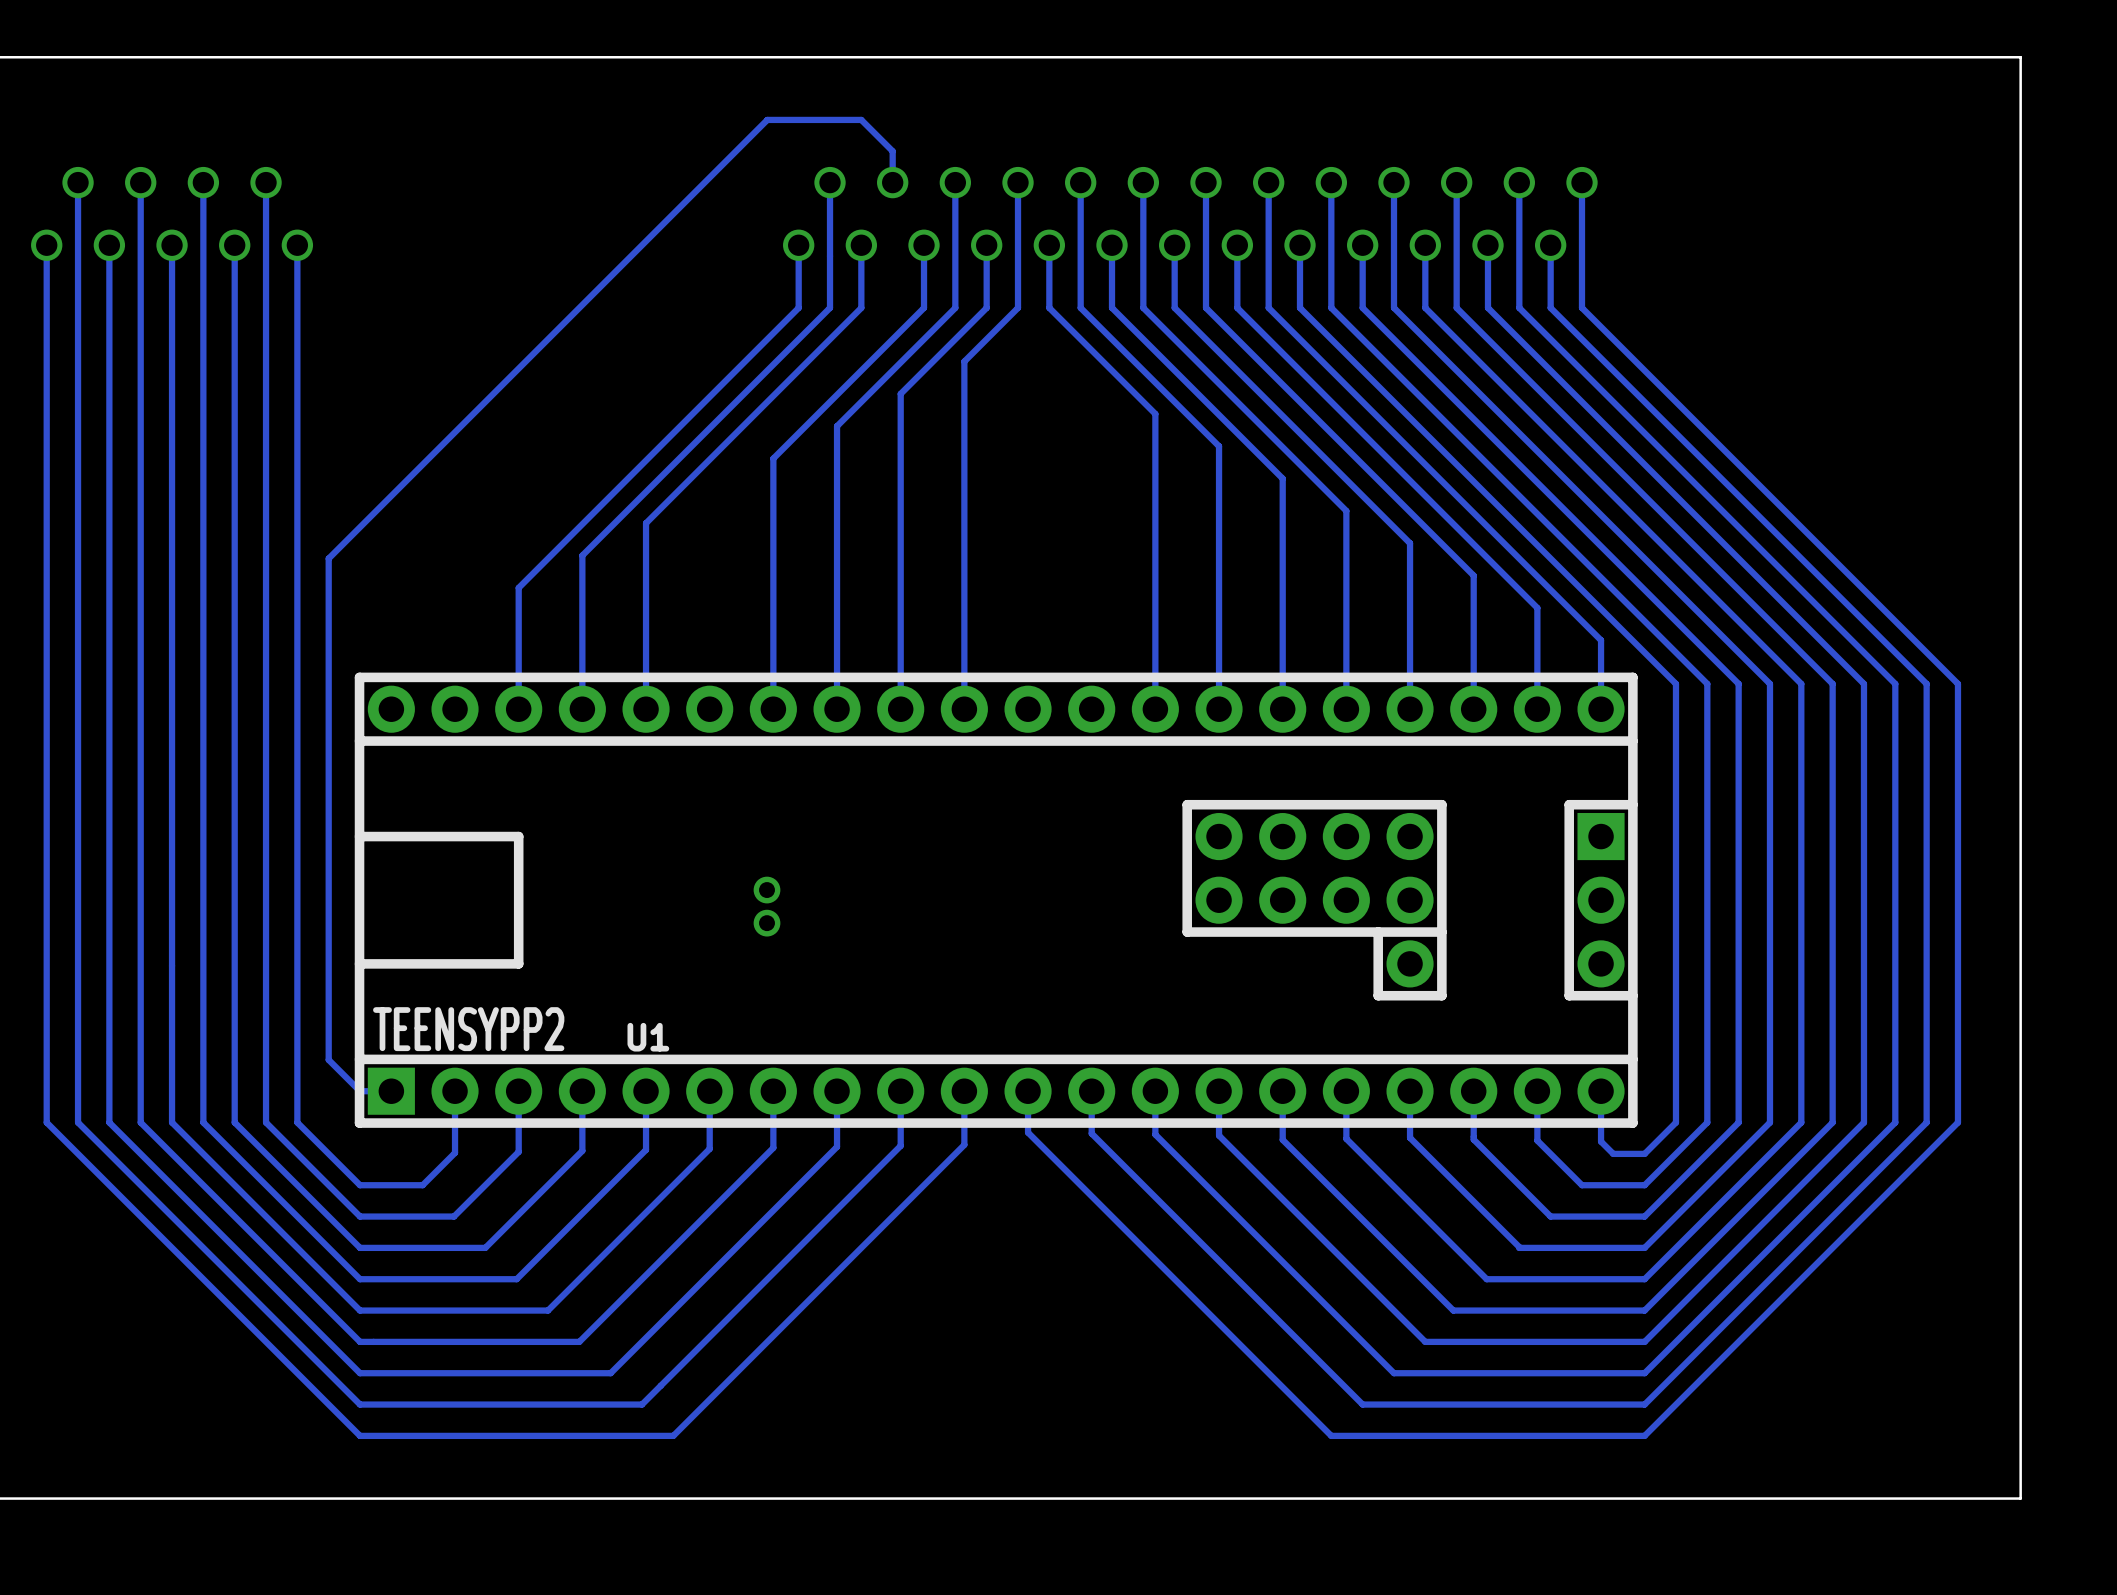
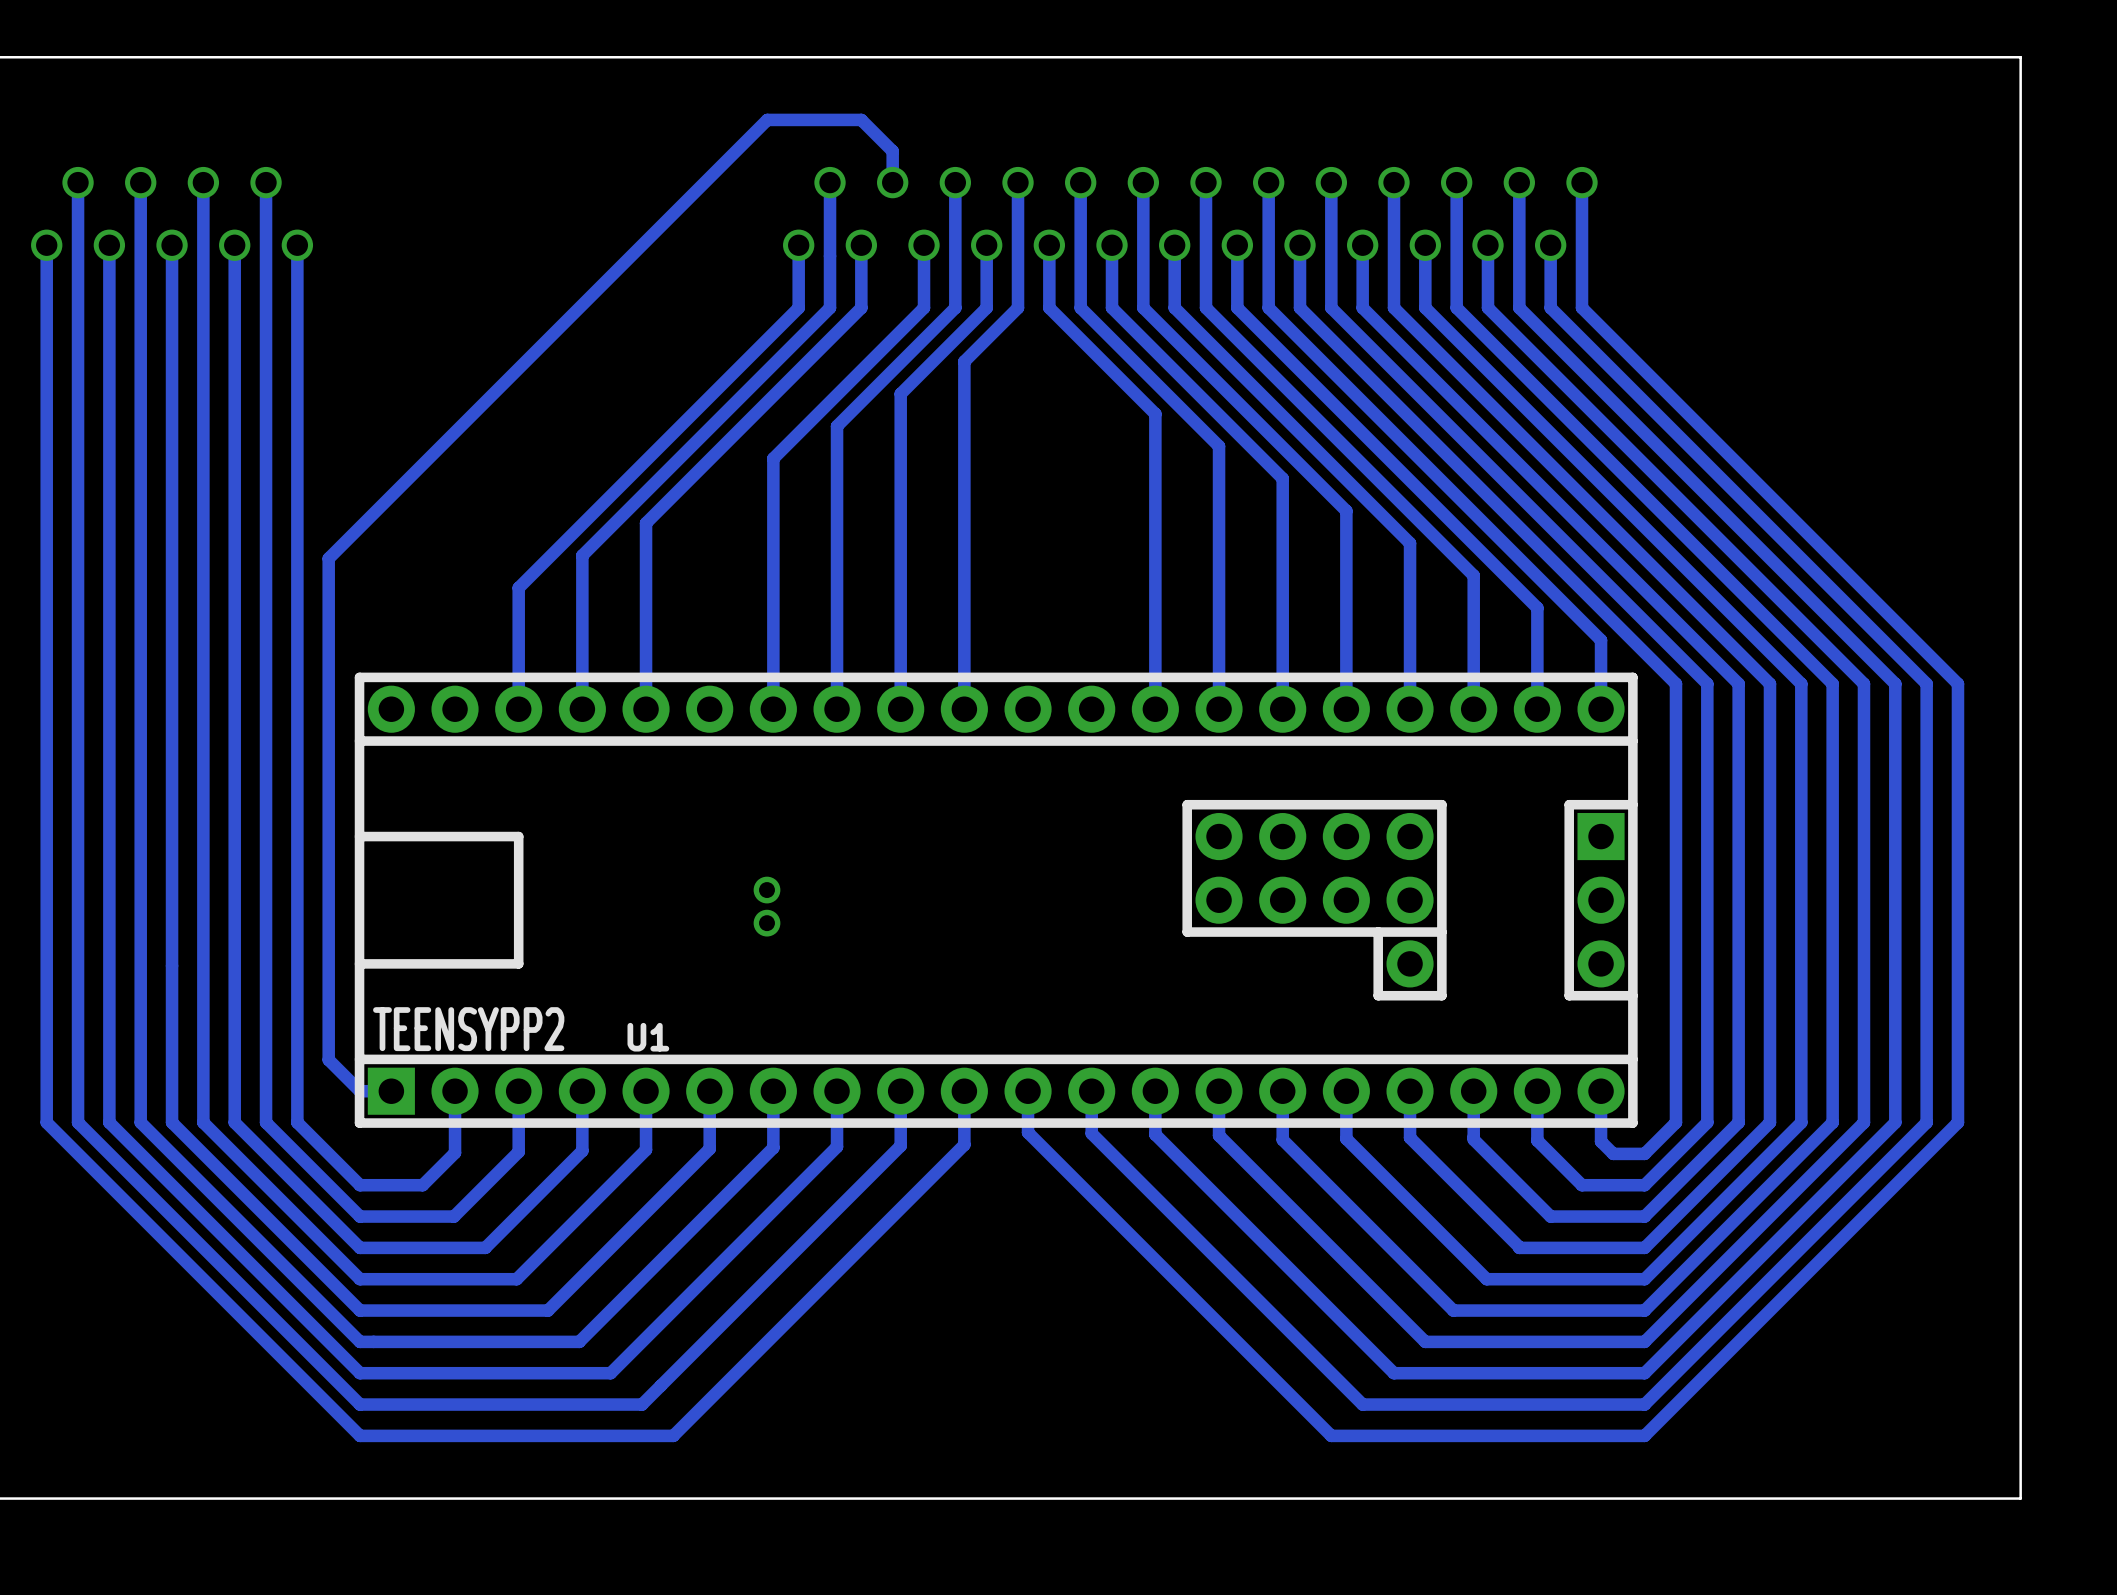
bottom track width: thin (78, 182) (78, 1122) (360, 1404) (642, 1404) (900, 1145) (900, 1091) -> thick (78, 182) (78, 1122) (360, 1404) (642, 1404) (900, 1145) (900, 1091)
bottom track width: thin (140, 182) (140, 1122) (360, 1341) (579, 1341) (773, 1147) (773, 1091) -> thick (140, 182) (140, 1122) (360, 1341) (579, 1341) (773, 1147) (773, 1091)
bottom track width: thin (203, 182) (203, 1122) (360, 1279) (516, 1279) (646, 1149) (646, 1091) -> thick (203, 182) (203, 1122) (360, 1279) (516, 1279) (646, 1149) (646, 1091)
bottom track width: thin (266, 182) (266, 1122) (360, 1216) (454, 1216) (518, 1151) (518, 1091) -> thick (266, 182) (266, 1122) (360, 1216) (454, 1216) (518, 1151) (518, 1091)
bottom track width: thin (830, 182) (830, 307) (582, 555) (582, 709) -> thick (830, 182) (830, 307) (582, 555) (582, 709)
bottom track width: thin (892, 182) (892, 151) (861, 119) (767, 119) (328, 558) (328, 1059) (360, 1091) (391, 1091) -> thick (892, 182) (892, 151) (861, 119) (767, 119) (328, 558) (328, 1059) (360, 1091) (391, 1091)
bottom track width: thin (955, 182) (955, 307) (837, 426) (837, 709) -> thick (955, 182) (955, 307) (837, 426) (837, 709)
bottom track width: thin (1018, 182) (1018, 307) (964, 361) (964, 709) -> thick (1018, 182) (1018, 307) (964, 361) (964, 709)
bottom track width: thin (1080, 182) (1080, 307) (1219, 446) (1219, 709) -> thick (1080, 182) (1080, 307) (1219, 446) (1219, 709)
bottom track width: thin (1143, 182) (1143, 307) (1346, 510) (1346, 709) -> thick (1143, 182) (1143, 307) (1346, 510) (1346, 709)
bottom track width: thin (1206, 182) (1206, 307) (1473, 575) (1473, 709) -> thick (1206, 182) (1206, 307) (1473, 575) (1473, 709)
bottom track width: thin (1268, 182) (1268, 307) (1601, 640) (1601, 709) -> thick (1268, 182) (1268, 307) (1601, 640) (1601, 709)
bottom track width: thin (1331, 182) (1331, 307) (1707, 683) (1707, 1122) (1644, 1185) (1581, 1185) (1537, 1140) (1537, 1091) -> thick (1331, 182) (1331, 307) (1707, 683) (1707, 1122) (1644, 1185) (1581, 1185) (1537, 1140) (1537, 1091)
bottom track width: thin (1394, 182) (1394, 307) (1769, 683) (1769, 1122) (1644, 1247) (1519, 1247) (1410, 1137) (1410, 1091) -> thick (1394, 182) (1394, 307) (1769, 683) (1769, 1122) (1644, 1247) (1519, 1247) (1410, 1137) (1410, 1091)
bottom track width: thin (1456, 182) (1456, 307) (1832, 683) (1832, 1122) (1644, 1310) (1453, 1310) (1282, 1139) (1282, 1091) -> thick (1456, 182) (1456, 307) (1832, 683) (1832, 1122) (1644, 1310) (1453, 1310) (1282, 1139) (1282, 1091)
bottom track width: thin (1519, 182) (1519, 307) (1895, 683) (1895, 1122) (1644, 1373) (1394, 1373) (1155, 1134) (1155, 1091) -> thick (1519, 182) (1519, 307) (1895, 683) (1895, 1122) (1644, 1373) (1394, 1373) (1155, 1134) (1155, 1091)
bottom track width: thin (1581, 182) (1581, 307) (1957, 683) (1957, 1122) (1644, 1435) (1331, 1435) (1028, 1132) (1028, 1091) -> thick (1581, 182) (1581, 307) (1957, 683) (1957, 1122) (1644, 1435) (1331, 1435) (1028, 1132) (1028, 1091)
bottom track width: thin (46, 245) (46, 1122) (360, 1435) (673, 1435) (964, 1144) (964, 1091) -> thick (46, 245) (46, 1122) (360, 1435) (673, 1435) (964, 1144) (964, 1091)
bottom track width: thin (109, 245) (109, 1122) (360, 1373) (610, 1373) (837, 1146) (837, 1091) -> thick (109, 245) (109, 1122) (360, 1373) (610, 1373) (837, 1146) (837, 1091)
bottom track width: thin (172, 245) (172, 1122) (360, 1310) (548, 1310) (709, 1148) (709, 1091) -> thick (172, 245) (172, 1122) (360, 1310) (548, 1310) (709, 1148) (709, 1091)
bottom track width: thin (234, 245) (234, 1122) (360, 1247) (485, 1247) (582, 1150) (582, 1091) -> thick (234, 245) (234, 1122) (360, 1247) (485, 1247) (582, 1150) (582, 1091)
bottom track width: thin (297, 245) (297, 1122) (360, 1185) (422, 1185) (455, 1152) (455, 1091) -> thick (297, 245) (297, 1122) (360, 1185) (422, 1185) (455, 1152) (455, 1091)
bottom track width: thin (798, 245) (798, 307) (518, 587) (518, 709) -> thick (798, 245) (798, 307) (518, 587) (518, 709)
bottom track width: thin (861, 245) (861, 307) (646, 523) (646, 709) -> thick (861, 245) (861, 307) (646, 523) (646, 709)
bottom track width: thin (924, 245) (924, 307) (773, 458) (773, 709) -> thick (924, 245) (924, 307) (773, 458) (773, 709)
bottom track width: thin (986, 245) (986, 307) (900, 393) (900, 709) -> thick (986, 245) (986, 307) (900, 393) (900, 709)
bottom track width: thin (1049, 245) (1049, 307) (1155, 413) (1155, 709) -> thick (1049, 245) (1049, 307) (1155, 413) (1155, 709)
bottom track width: thin (1112, 245) (1112, 307) (1282, 478) (1282, 709) -> thick (1112, 245) (1112, 307) (1282, 478) (1282, 709)
bottom track width: thin (1174, 245) (1174, 307) (1410, 543) (1410, 709) -> thick (1174, 245) (1174, 307) (1410, 543) (1410, 709)
bottom track width: thin (1237, 245) (1237, 307) (1537, 607) (1537, 709) -> thick (1237, 245) (1237, 307) (1537, 607) (1537, 709)
bottom track width: thin (1300, 245) (1300, 307) (1675, 683) (1675, 1122) (1644, 1153) (1613, 1153) (1601, 1141) (1601, 1091) -> thick (1300, 245) (1300, 307) (1675, 683) (1675, 1122) (1644, 1153) (1613, 1153) (1601, 1141) (1601, 1091)
bottom track width: thin (1362, 245) (1362, 307) (1738, 683) (1738, 1122) (1644, 1216) (1550, 1216) (1473, 1139) (1473, 1091) -> thick (1362, 245) (1362, 307) (1738, 683) (1738, 1122) (1644, 1216) (1550, 1216) (1473, 1139) (1473, 1091)
bottom track width: thin (1425, 245) (1425, 307) (1801, 683) (1801, 1122) (1644, 1279) (1486, 1279) (1346, 1138) (1346, 1091) -> thick (1425, 245) (1425, 307) (1801, 683) (1801, 1122) (1644, 1279) (1486, 1279) (1346, 1138) (1346, 1091)
bottom track width: thin (1487, 245) (1487, 307) (1863, 683) (1863, 1122) (1644, 1341) (1425, 1341) (1219, 1135) (1219, 1091) -> thick (1487, 245) (1487, 307) (1863, 683) (1863, 1122) (1644, 1341) (1425, 1341) (1219, 1135) (1219, 1091)
bottom track width: thin (1550, 245) (1550, 307) (1926, 683) (1926, 1122) (1644, 1404) (1362, 1404) (1091, 1133) (1091, 1091) -> thick (1550, 245) (1550, 307) (1926, 683) (1926, 1122) (1644, 1404) (1362, 1404) (1091, 1133) (1091, 1091)

